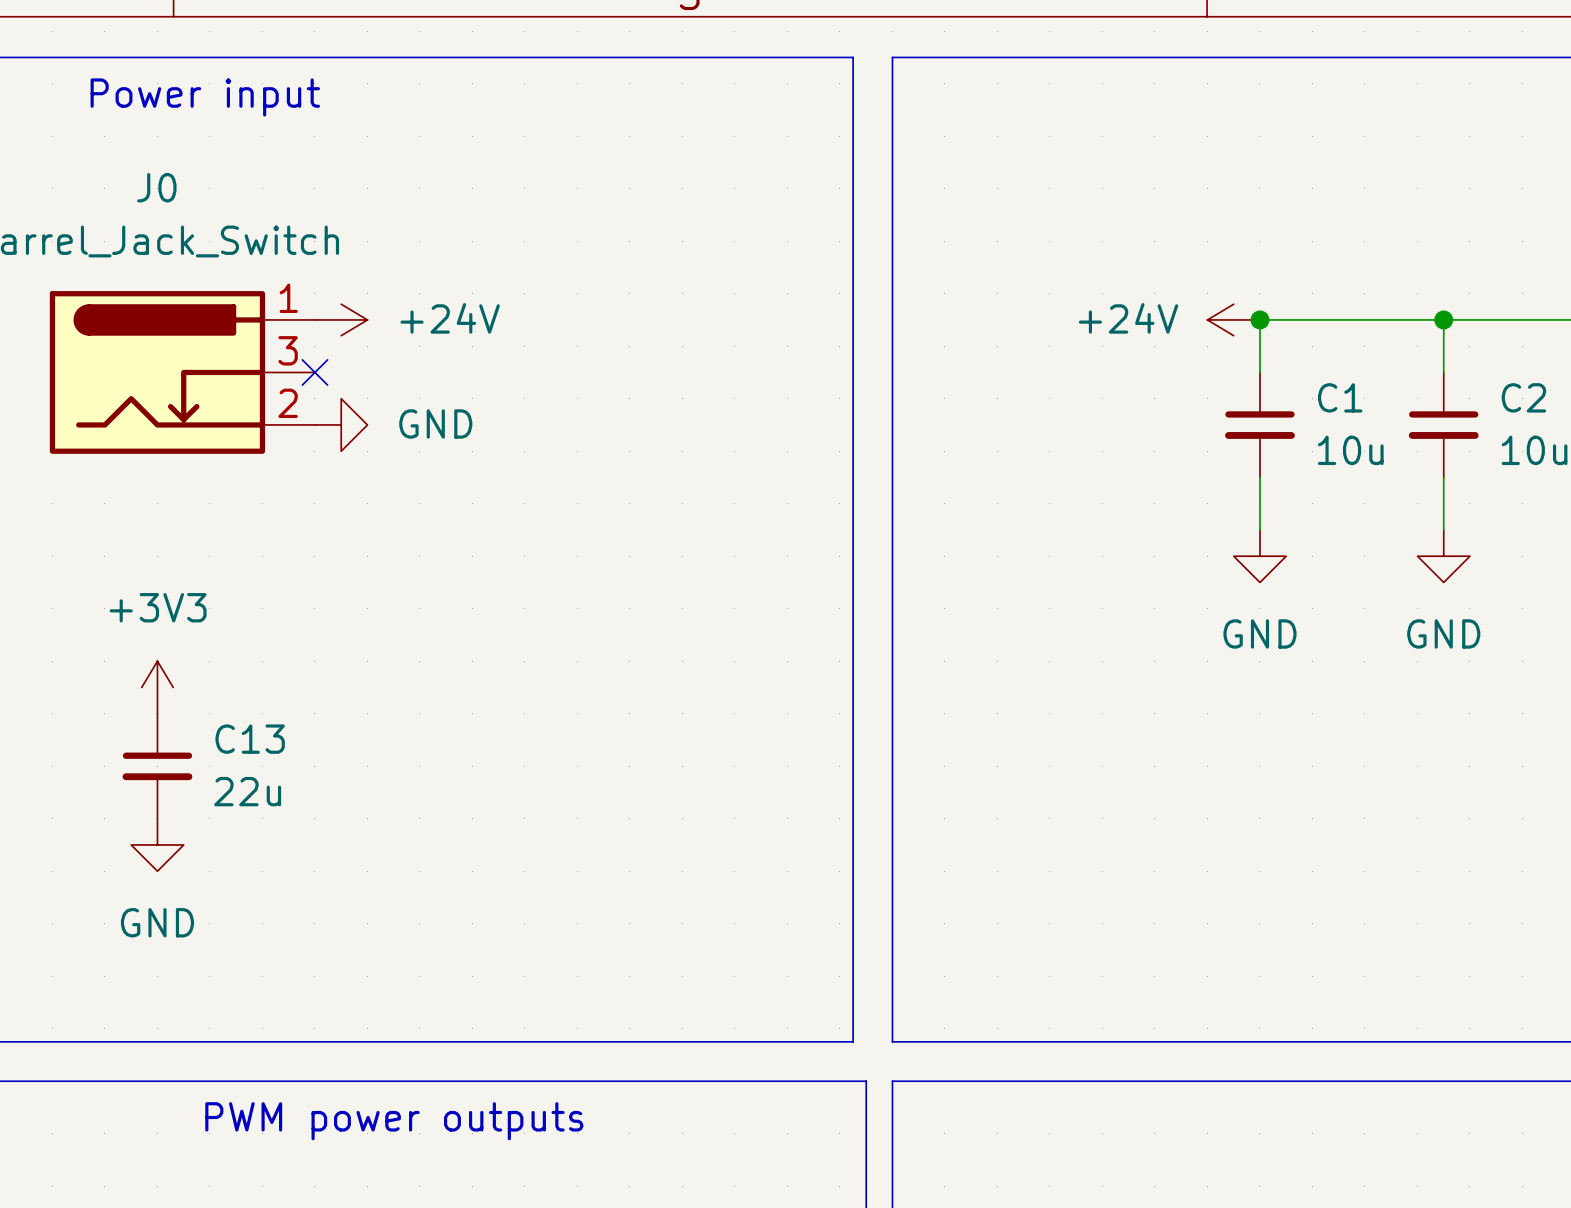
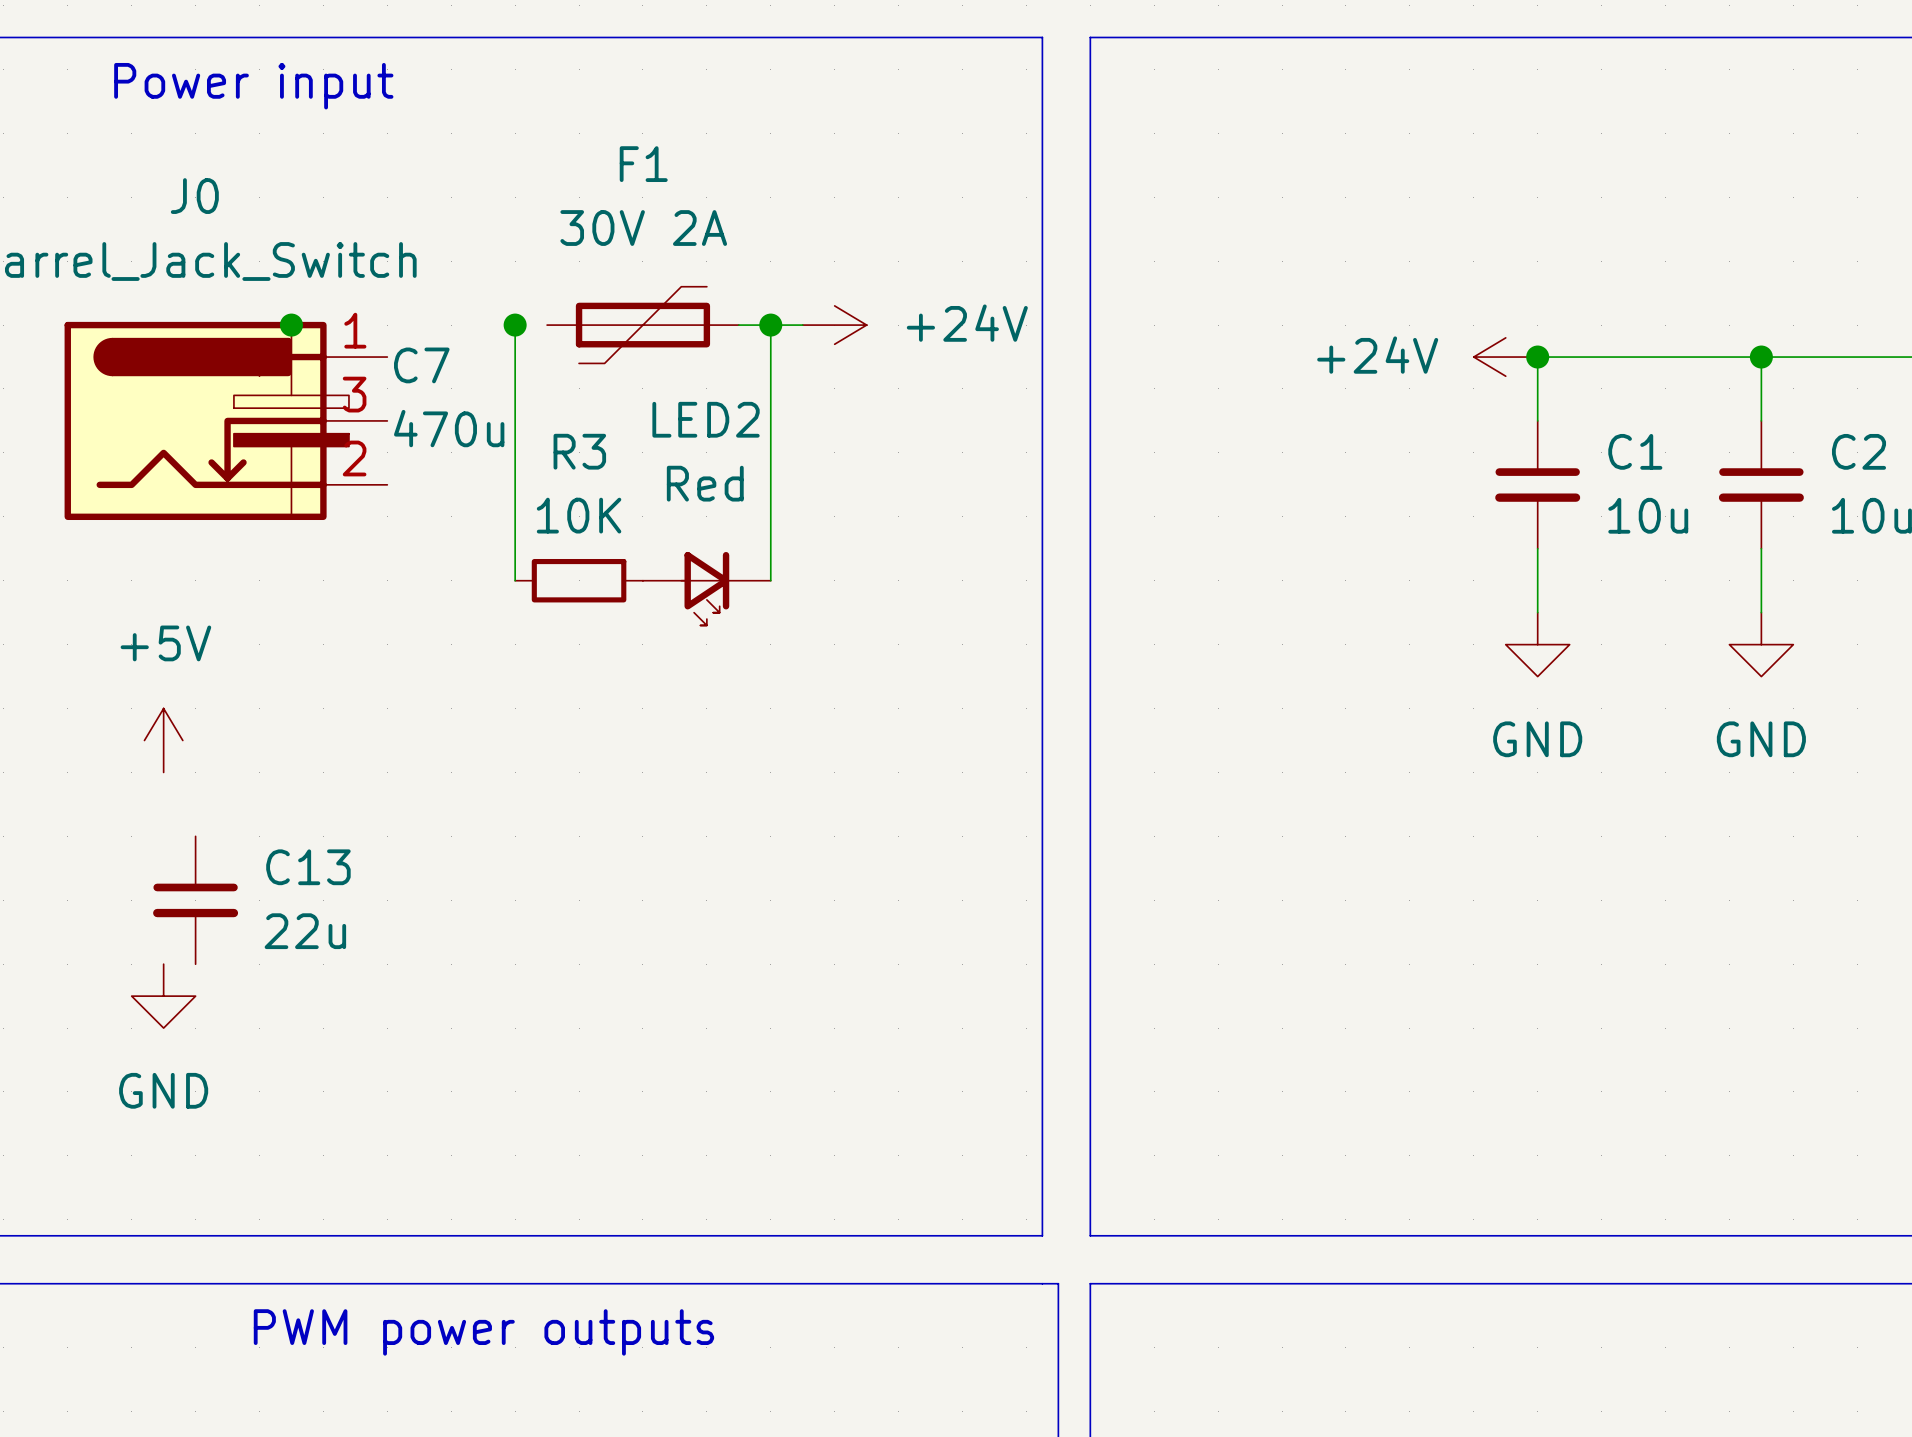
junction: none -> (291, 325)
wire: none -> (515, 325) (515, 580)
junction: none -> (515, 325)
F1: none -> 30V 2A (642, 325)
wire: none -> (738, 325) (802, 325)
wire: none -> (770, 325) (770, 580)
junction: none -> (770, 325)
power symbol position: +24V (341, 319) -> +24V (834, 325)
C7: none -> 470u (291, 420)
no-connect mark: (314, 372) -> none
power symbol: GND (341, 424) -> none
R3: none -> 10K (579, 580)
LED2: none -> Red (706, 588)
power symbol: none -> +5V (163, 740)
power symbol: +3V3 (157, 687) -> none
power symbol position: GND (157, 844) -> GND (163, 996)

